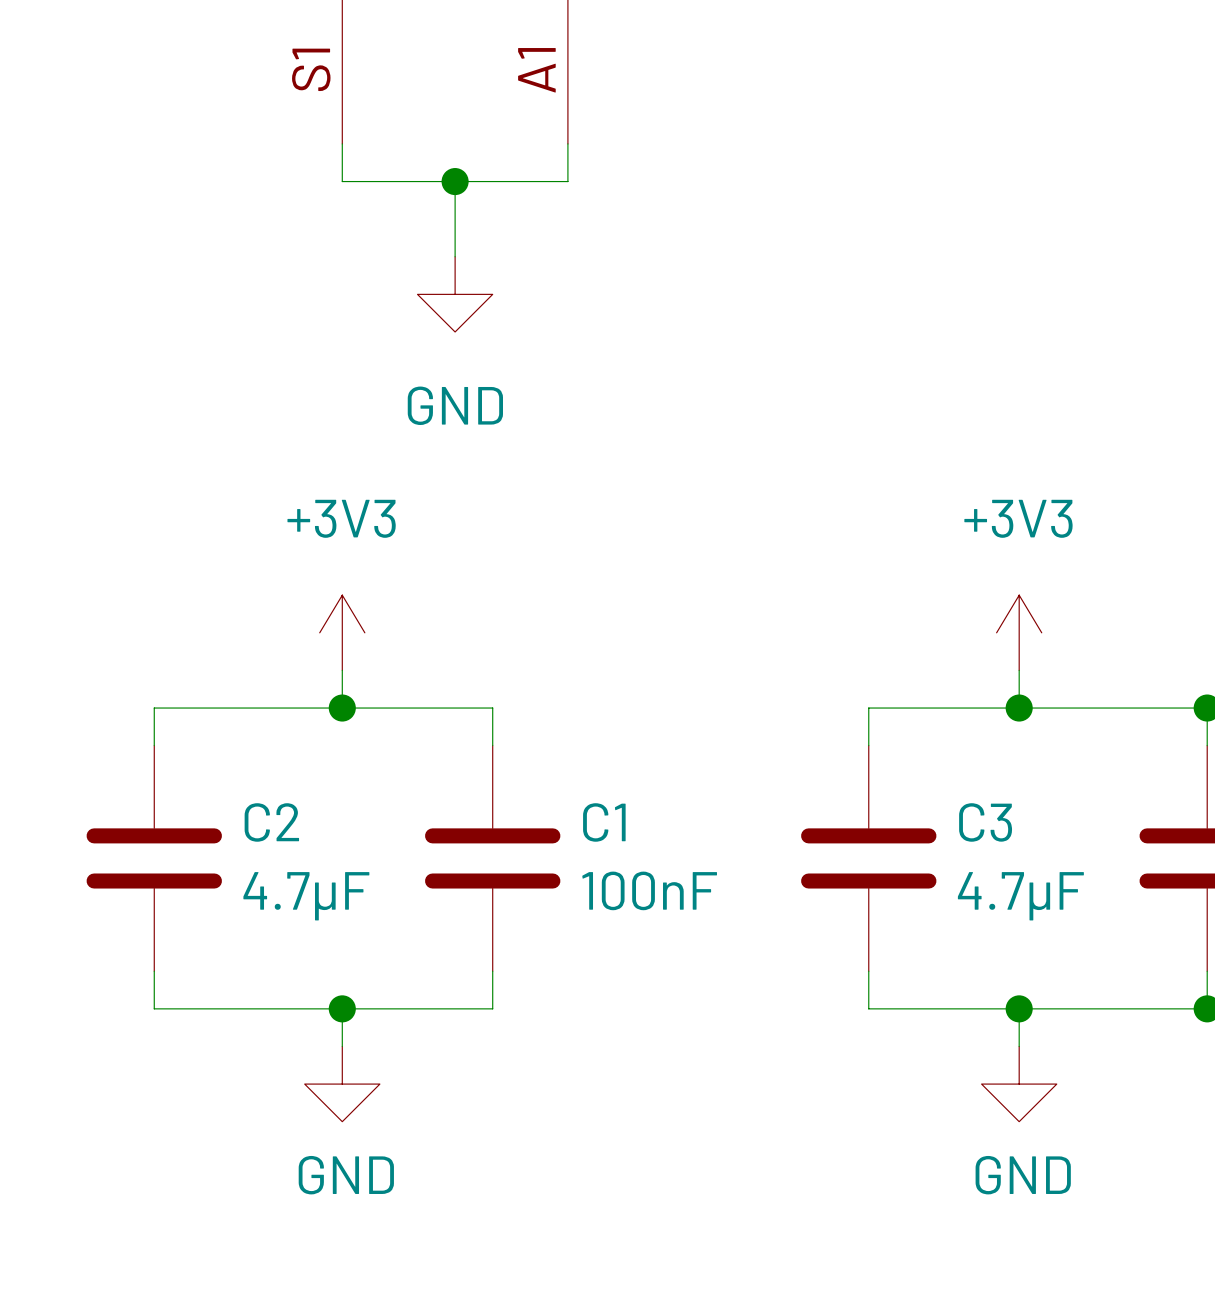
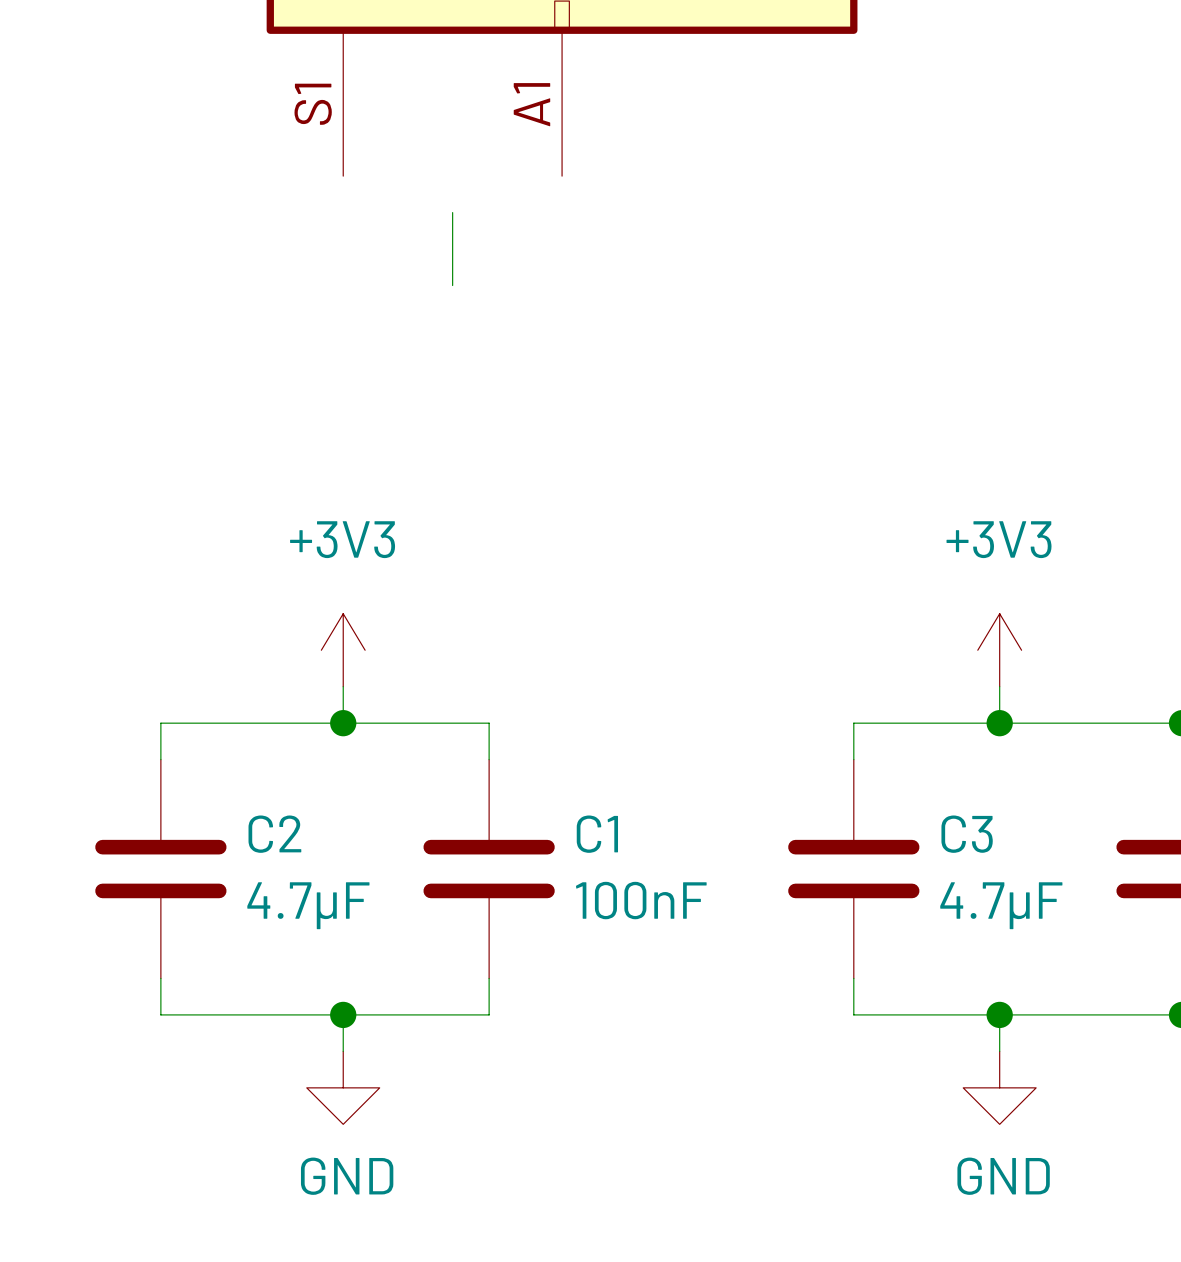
wire: (342, 143) (342, 181) (567, 181) (567, 143) -> none
junction: (455, 181) -> none
power symbol: GND (455, 294) -> none

